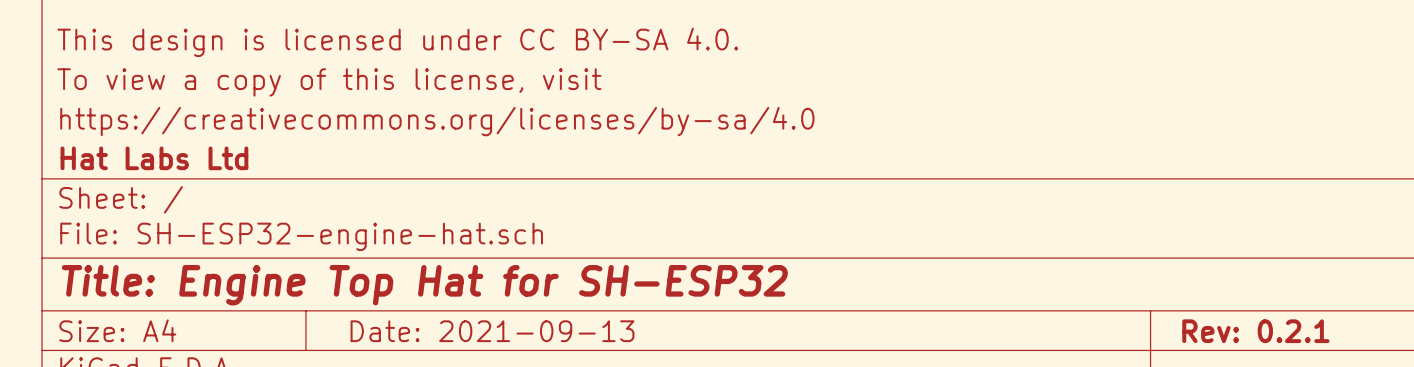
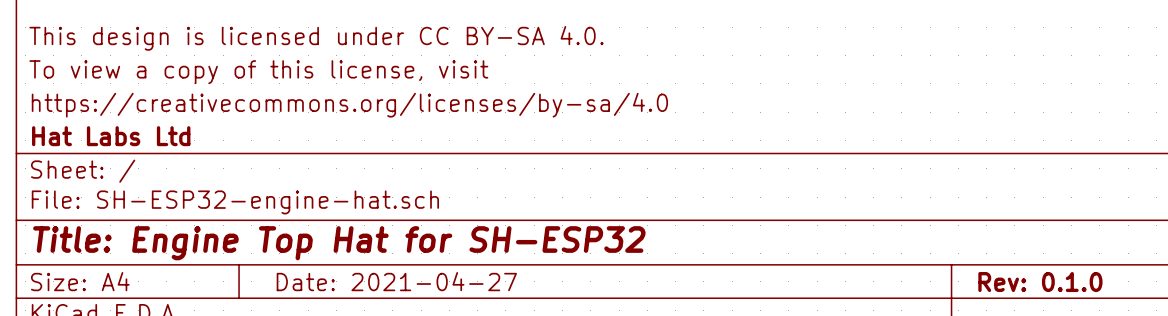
title block: Date: 2021-09-13 (492, 331) -> Date: 2021-04-27 (396, 281)
title block: Rev: 0.2.1 (1255, 331) -> Rev: 0.1.0 (1040, 282)

